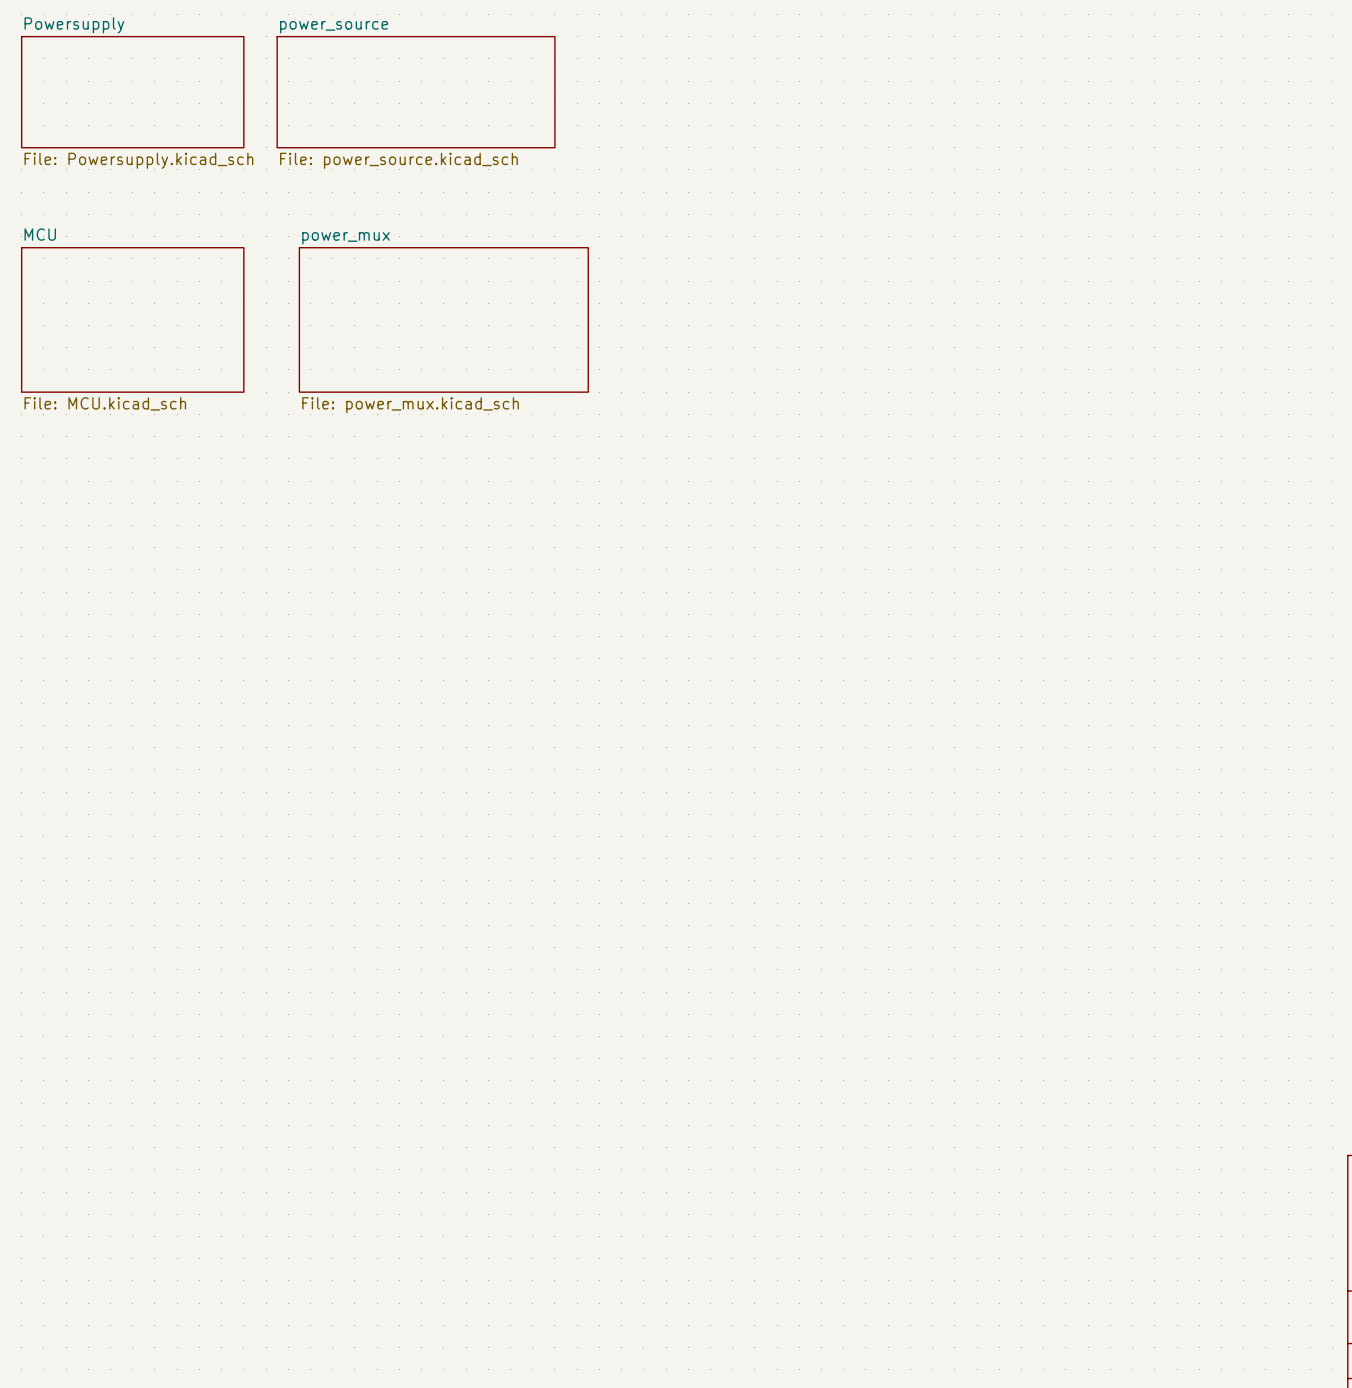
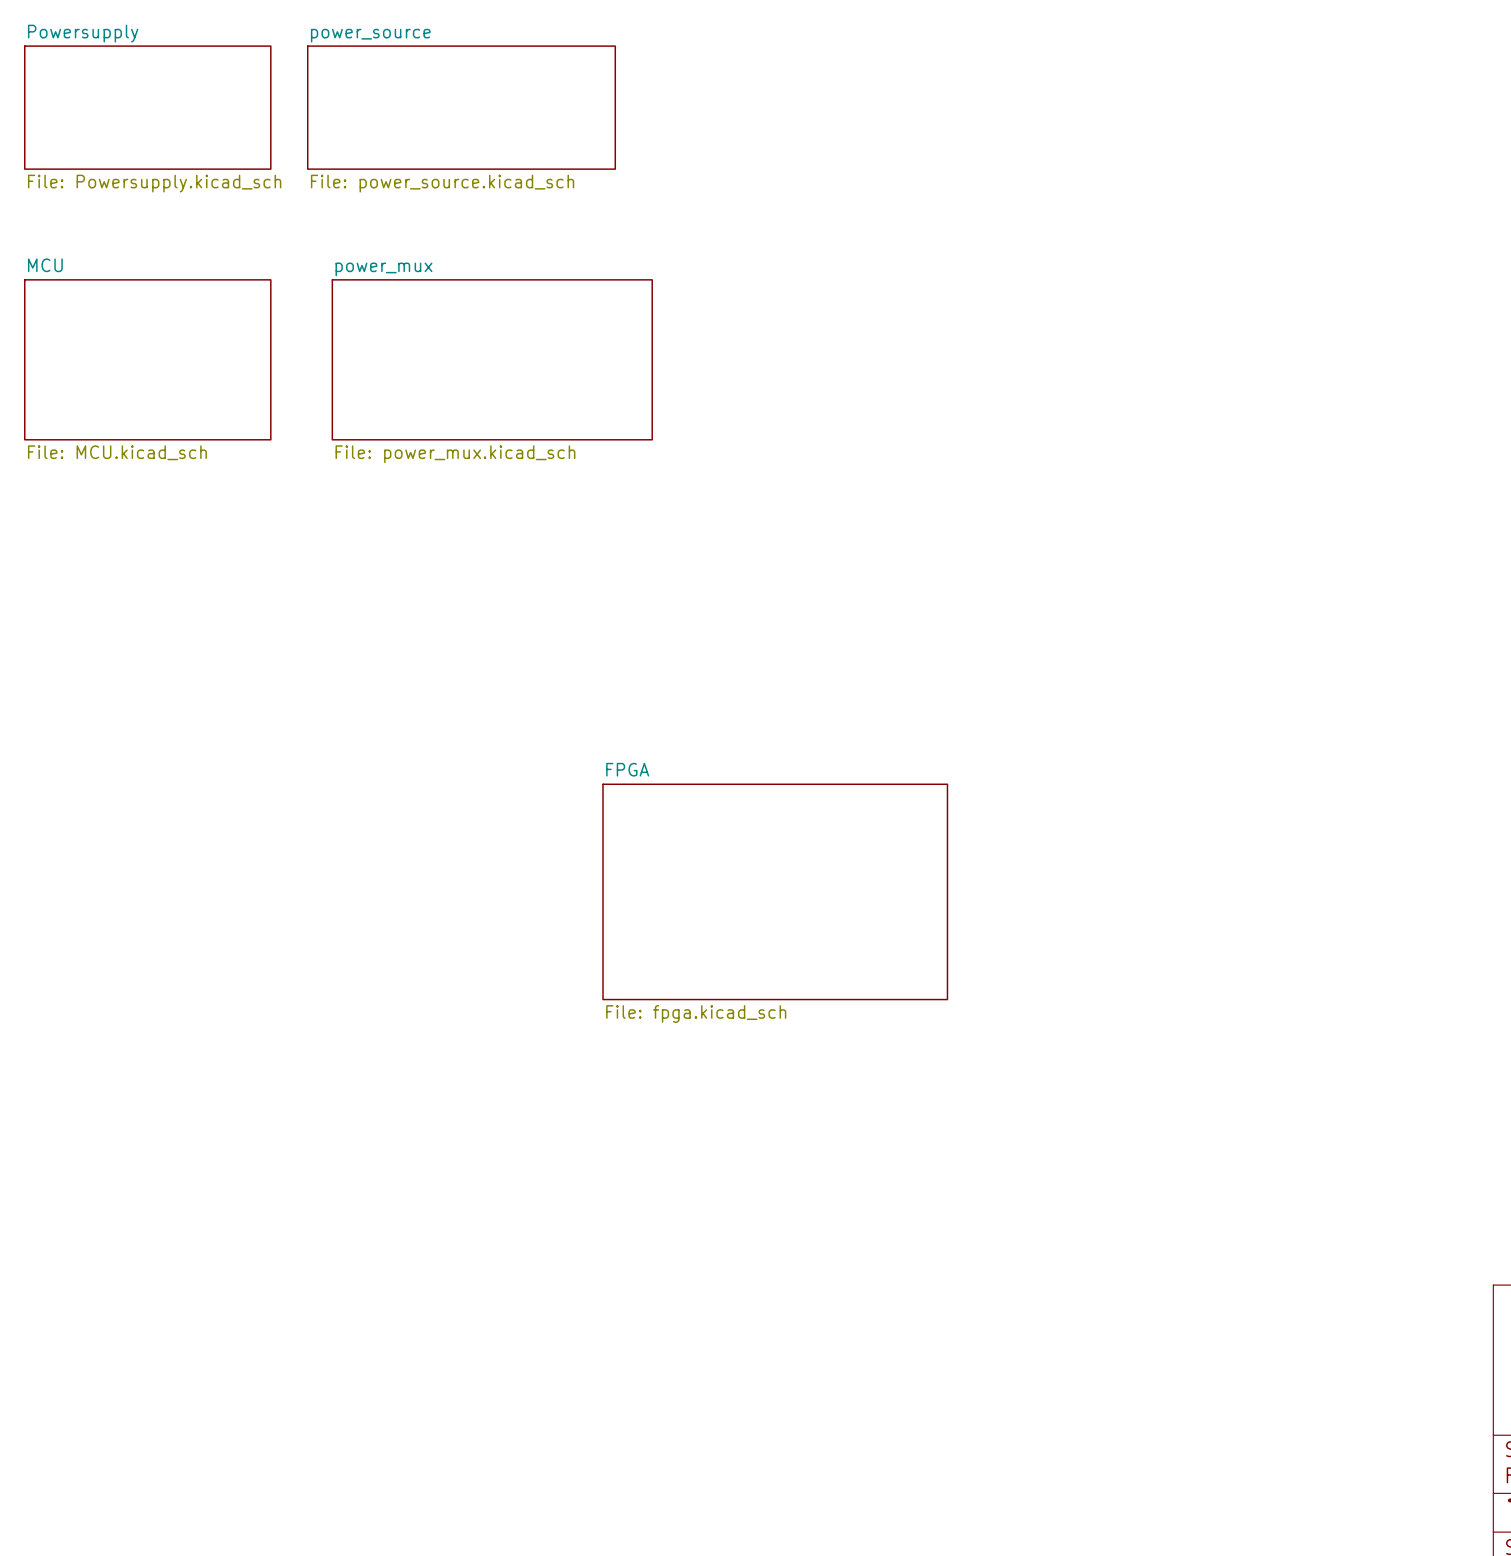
sheet FPGA: none -> File: fpga.kicad_sch (775, 891)

